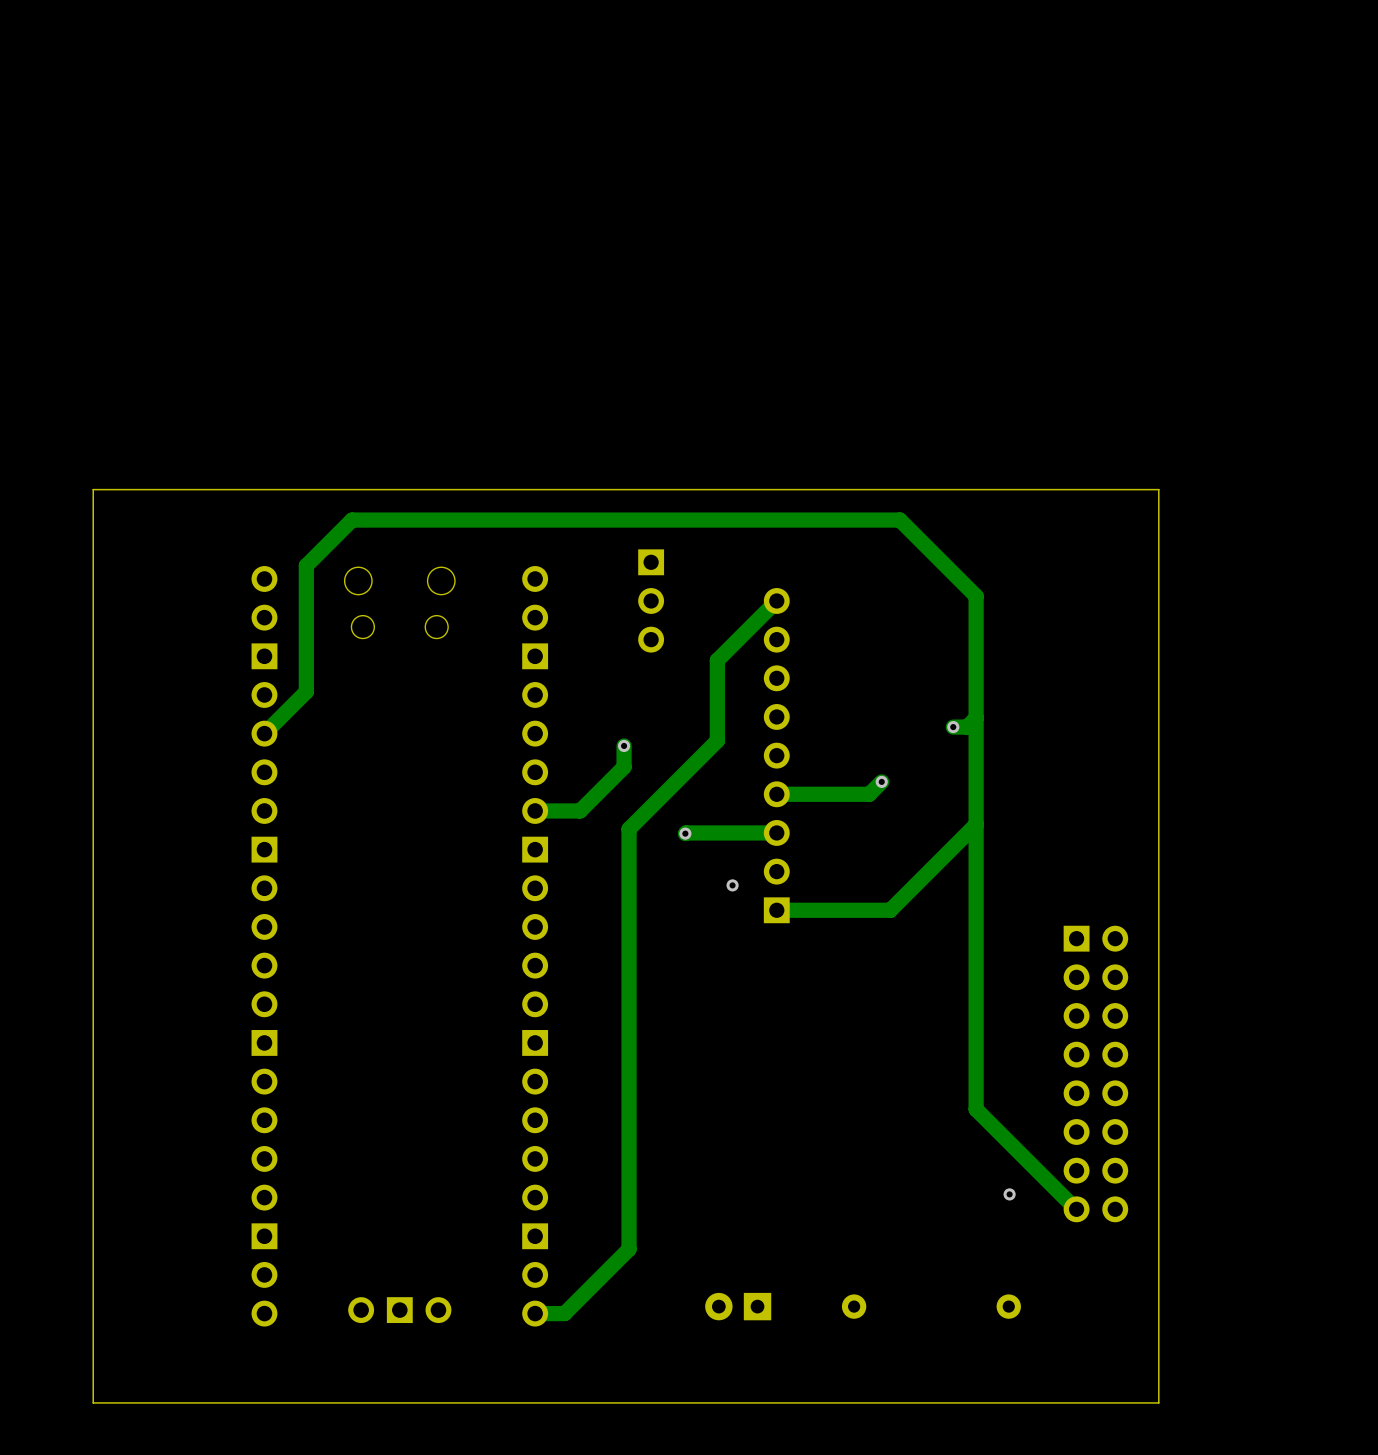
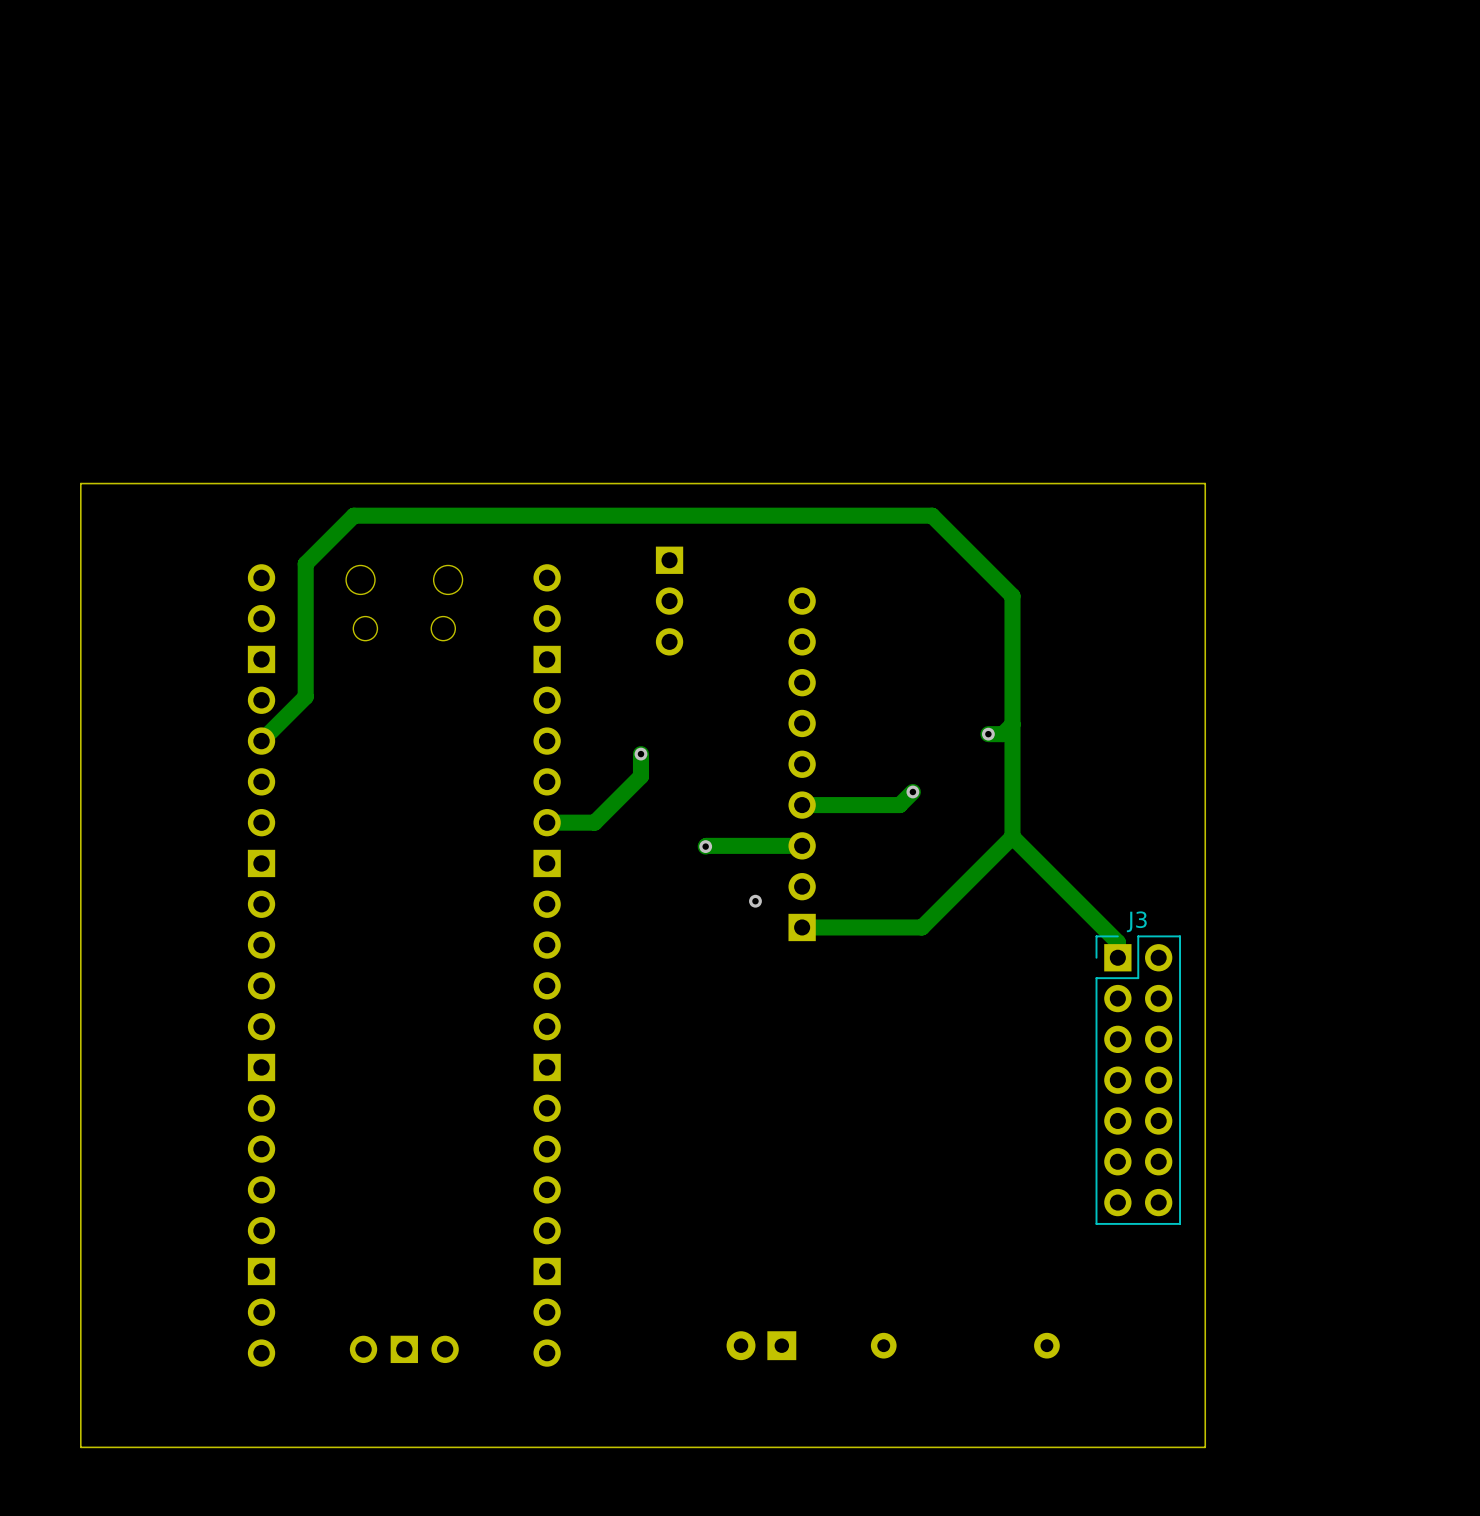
track: (776, 600) (717, 660) (717, 740) (629, 829) (629, 1249) (564, 1313) (535, 1313) -> none
track: (976, 824) (976, 1109) (1076, 1209) -> (1012, 836) (1117, 942) (1117, 957)
J3: none -> (1138, 1080)
part: (1095, 1074) -> none
via: (1009, 1194) -> none

